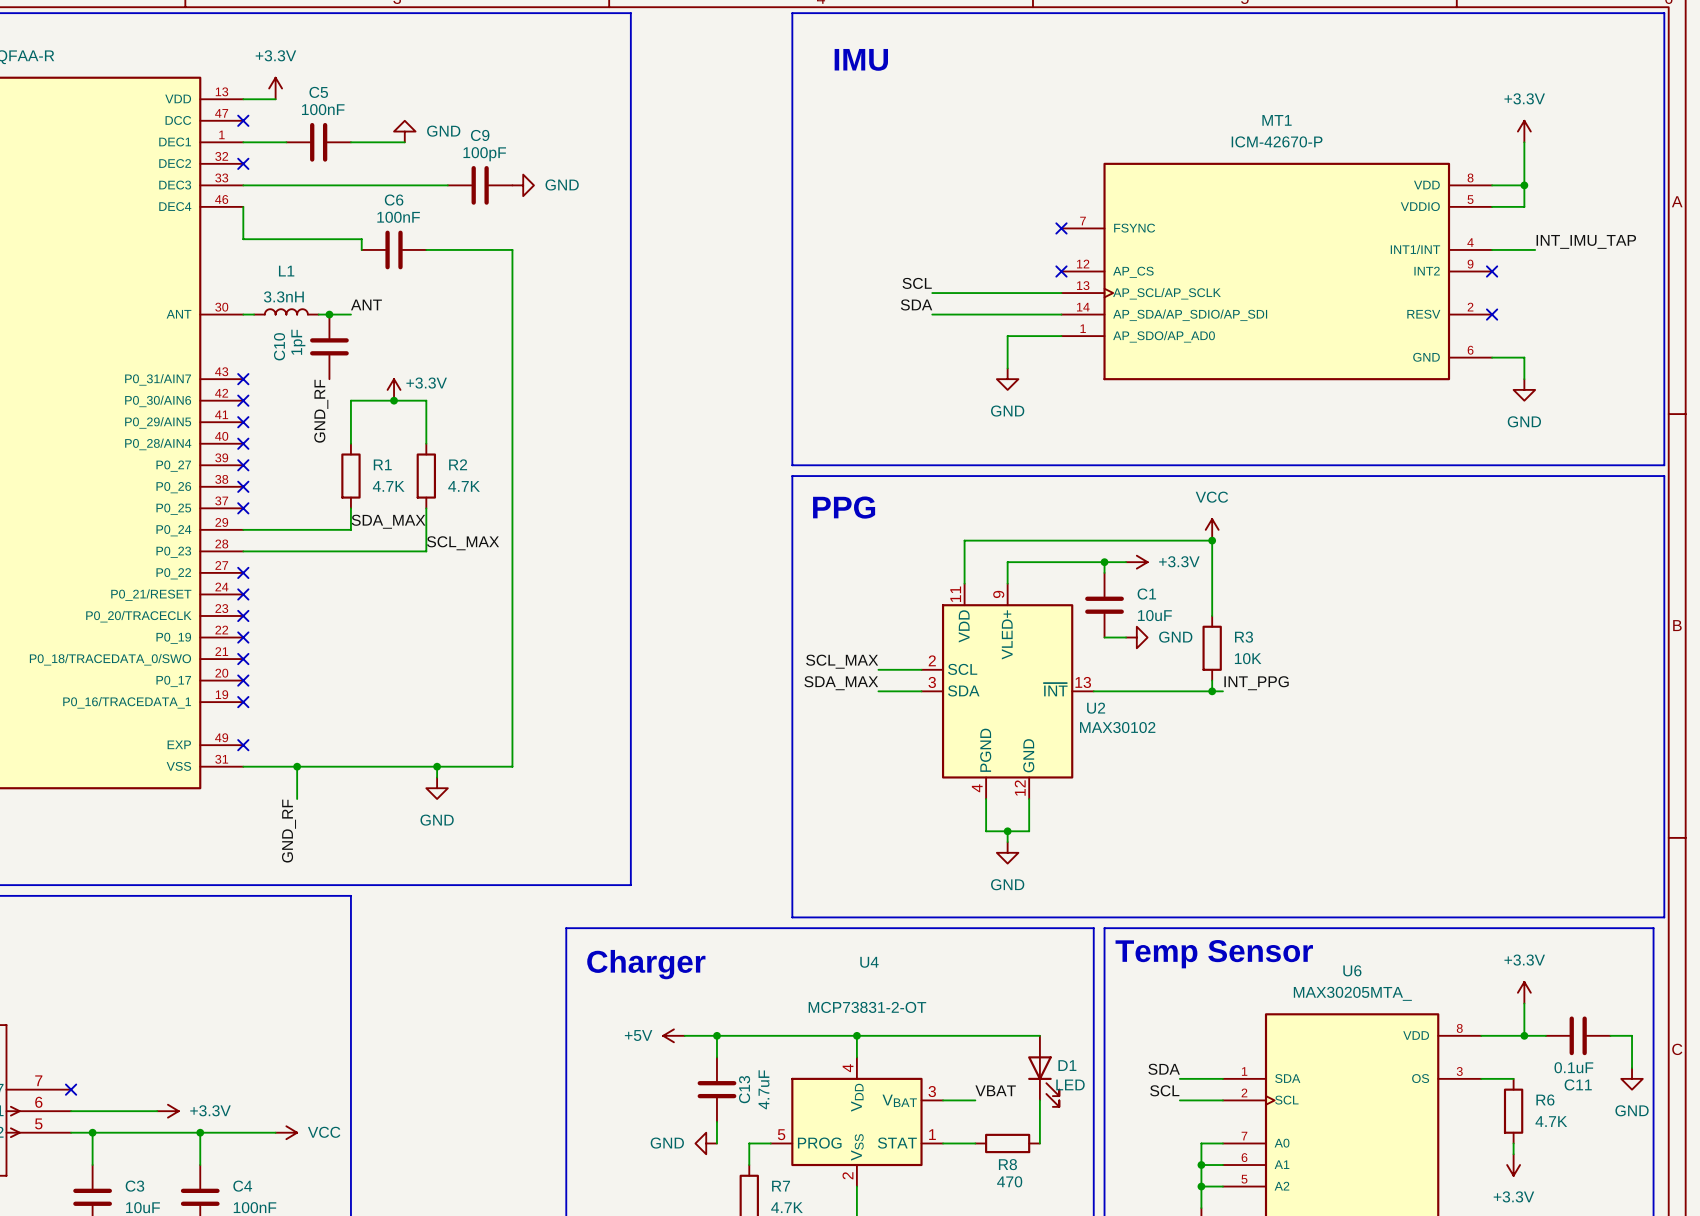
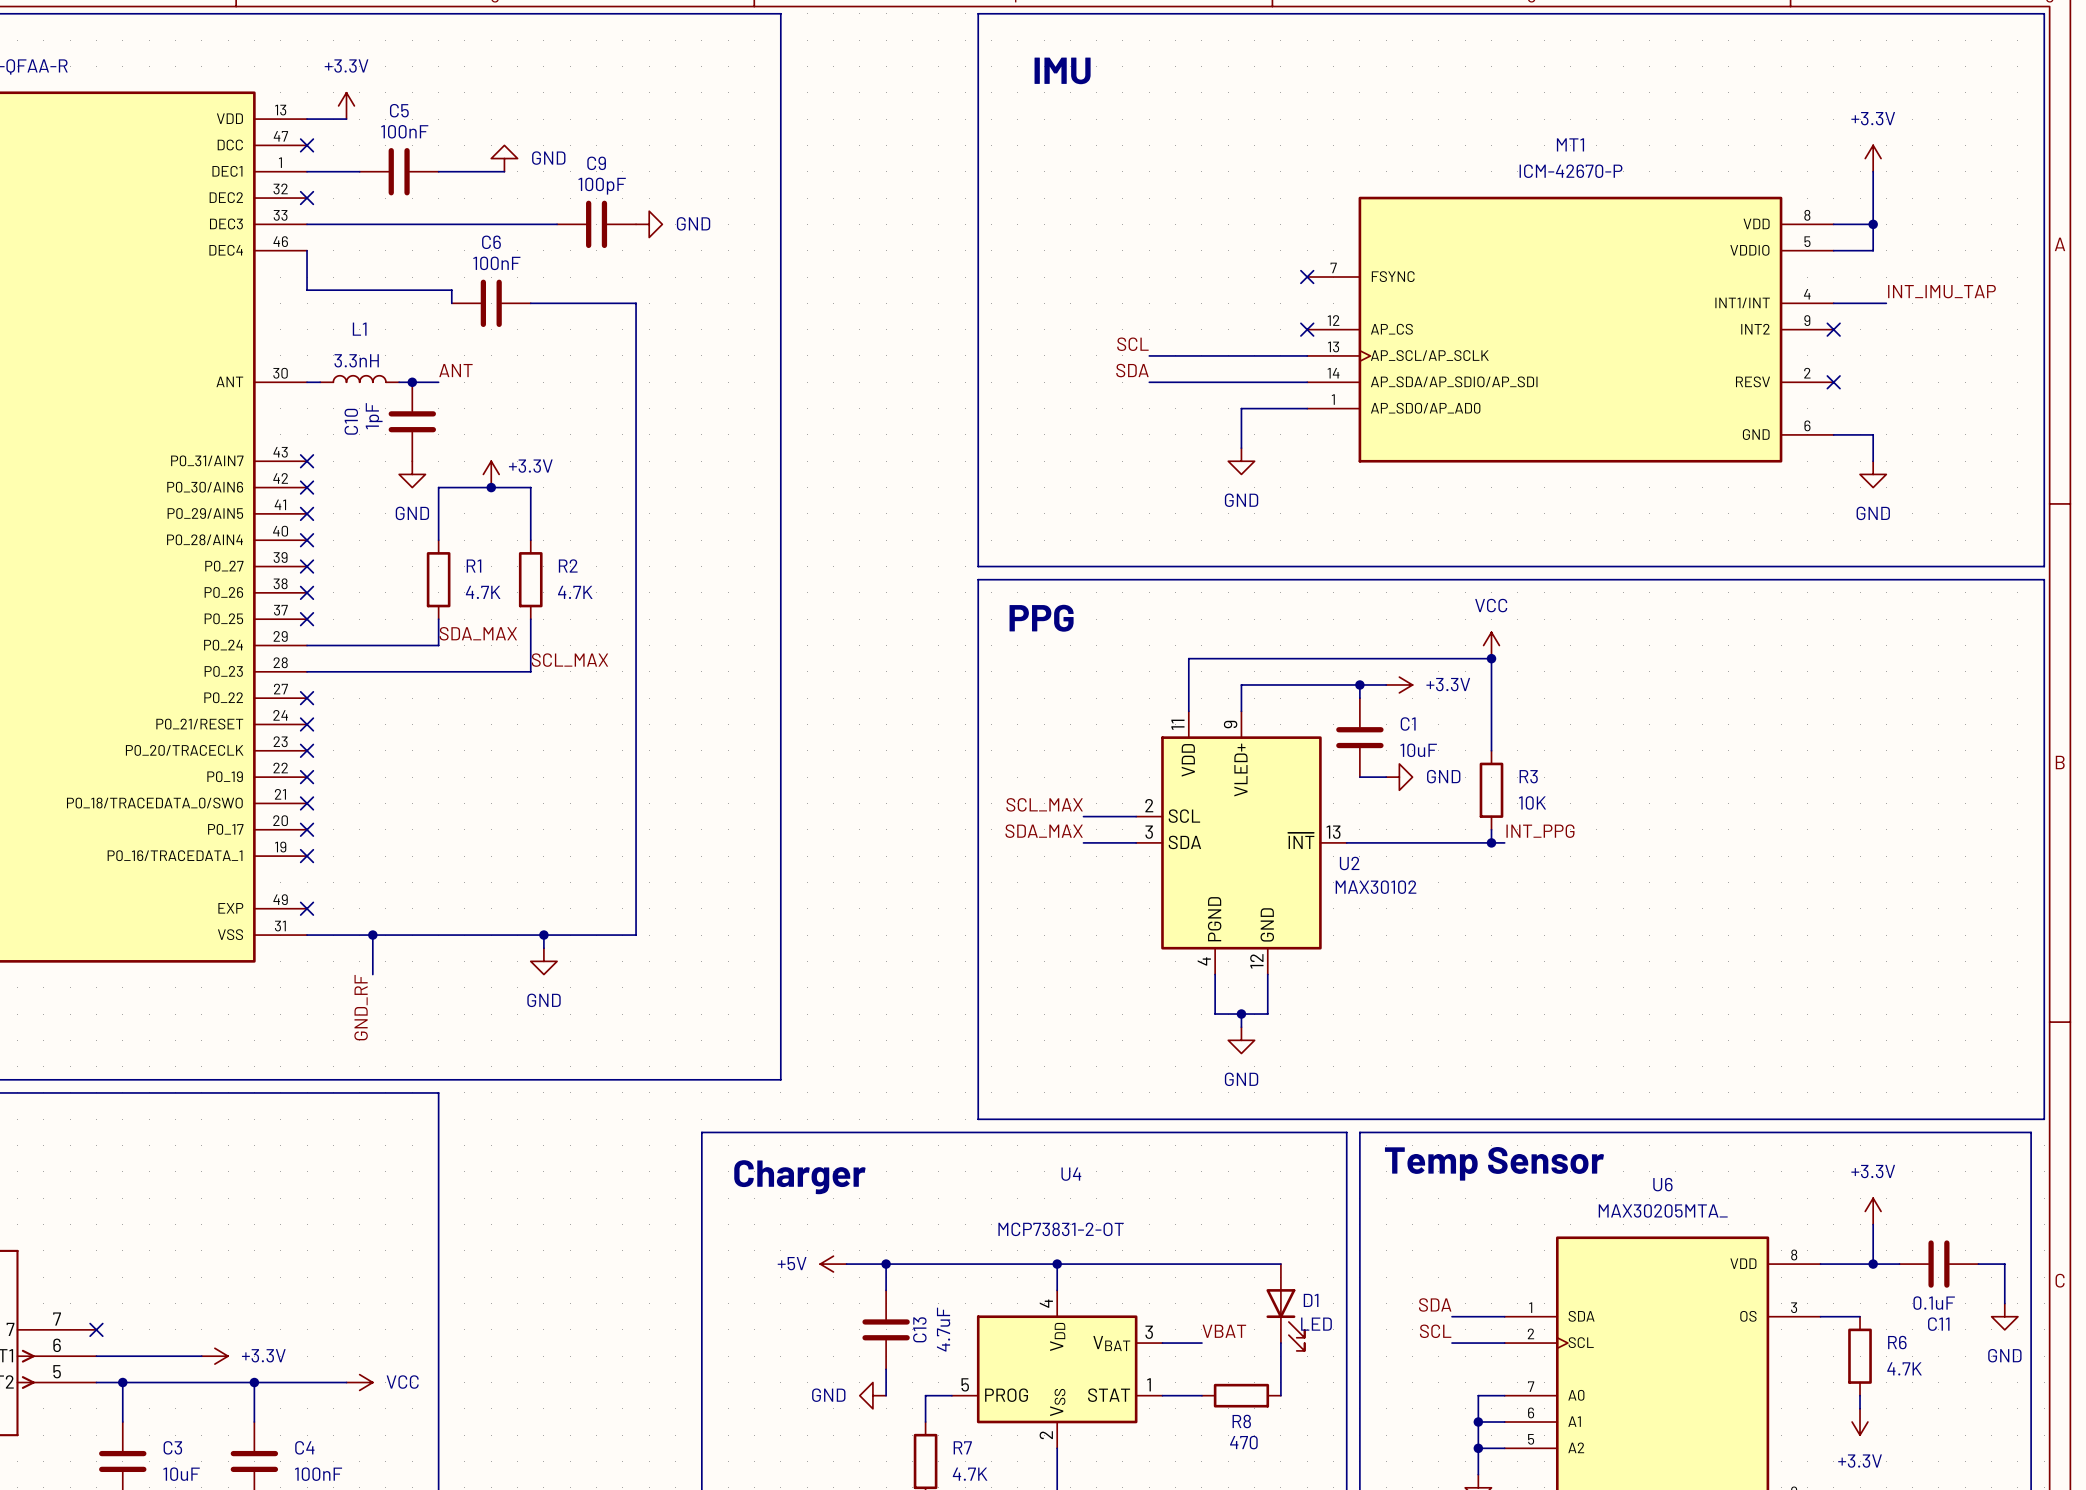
power symbol: none -> GND (412, 474)
label: GND_RF (321, 411) -> none

